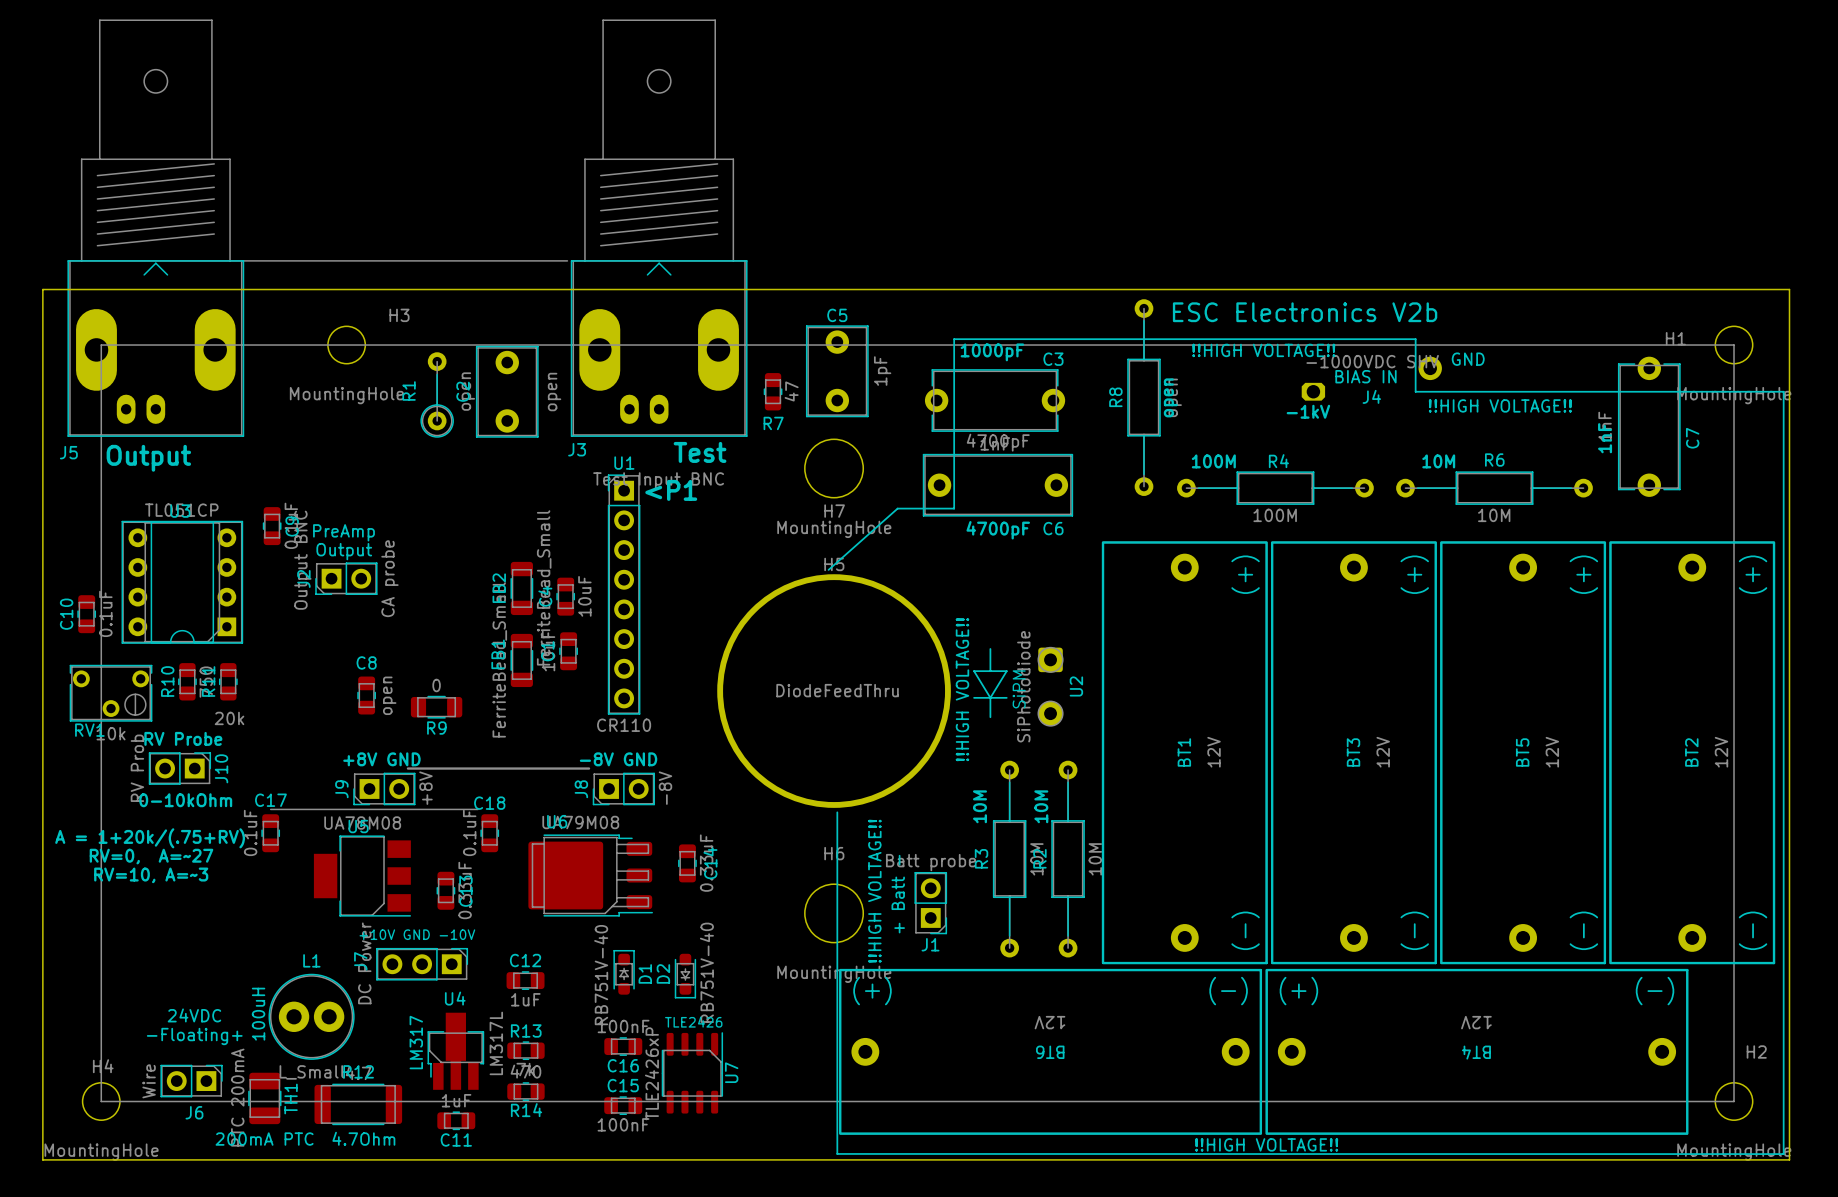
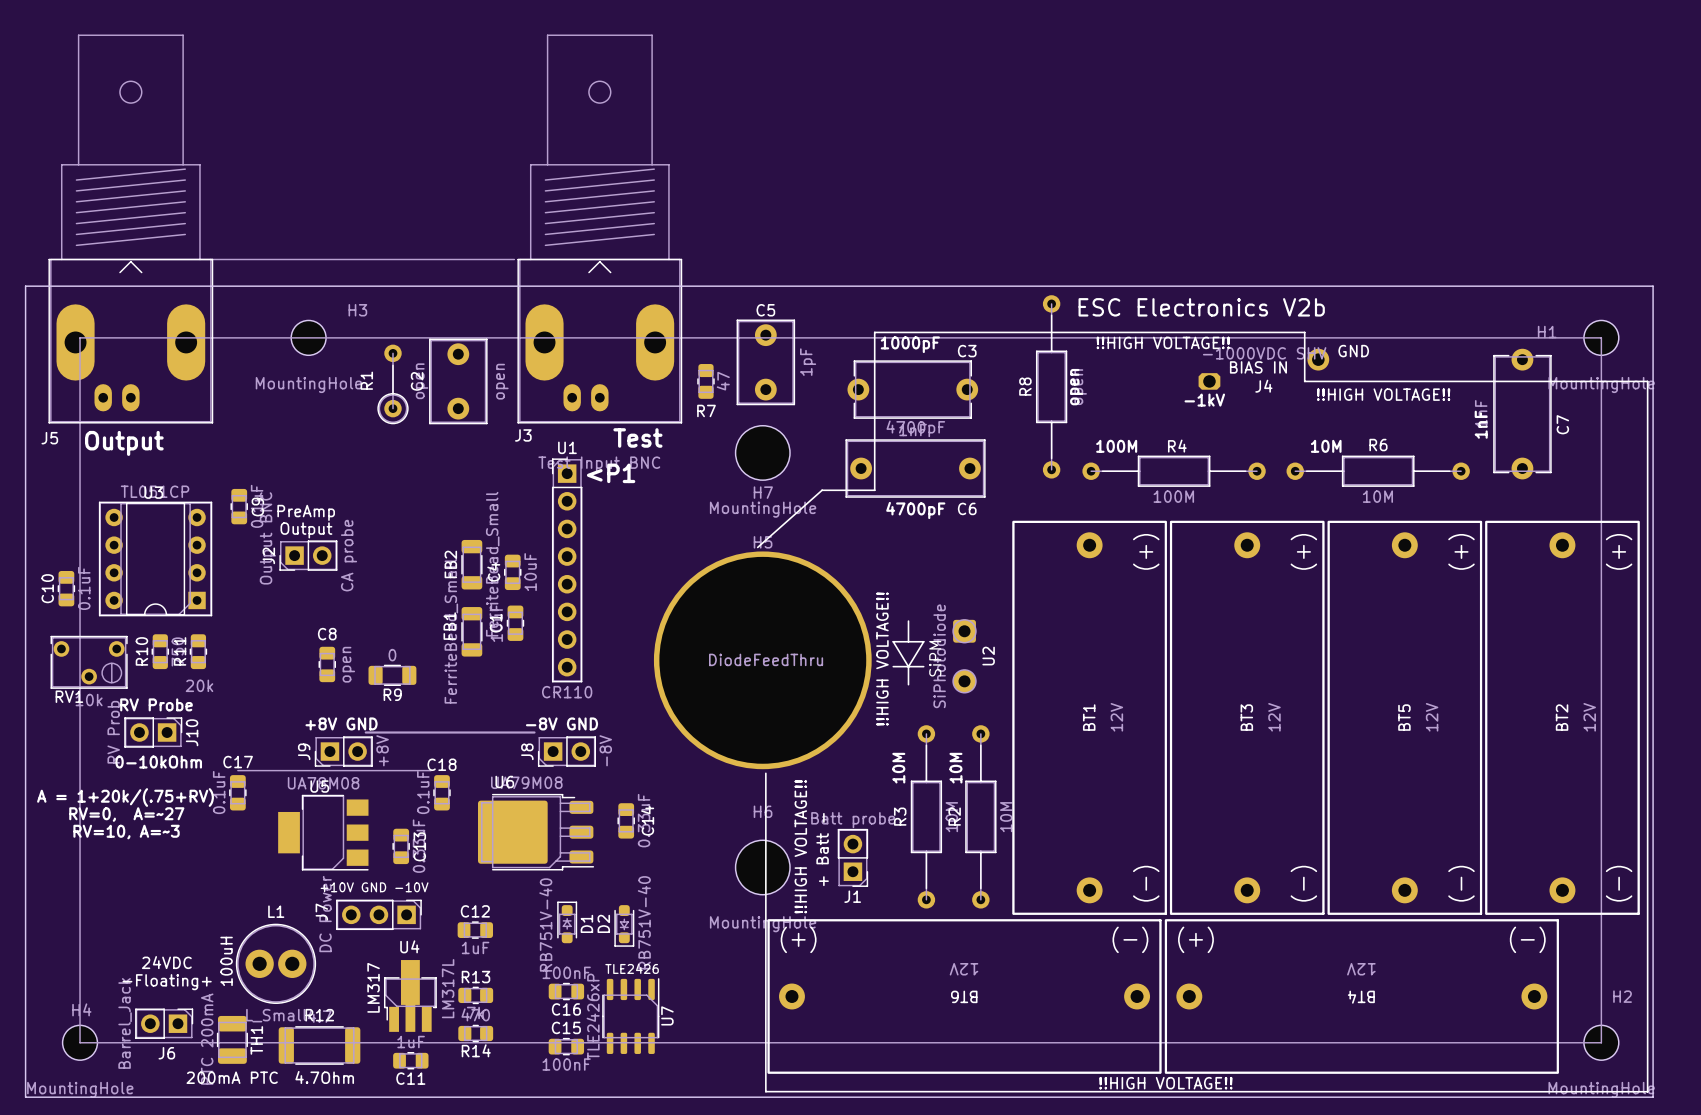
J6 value: Wire (149, 1081) -> Barrel_Jack (125, 1023)

